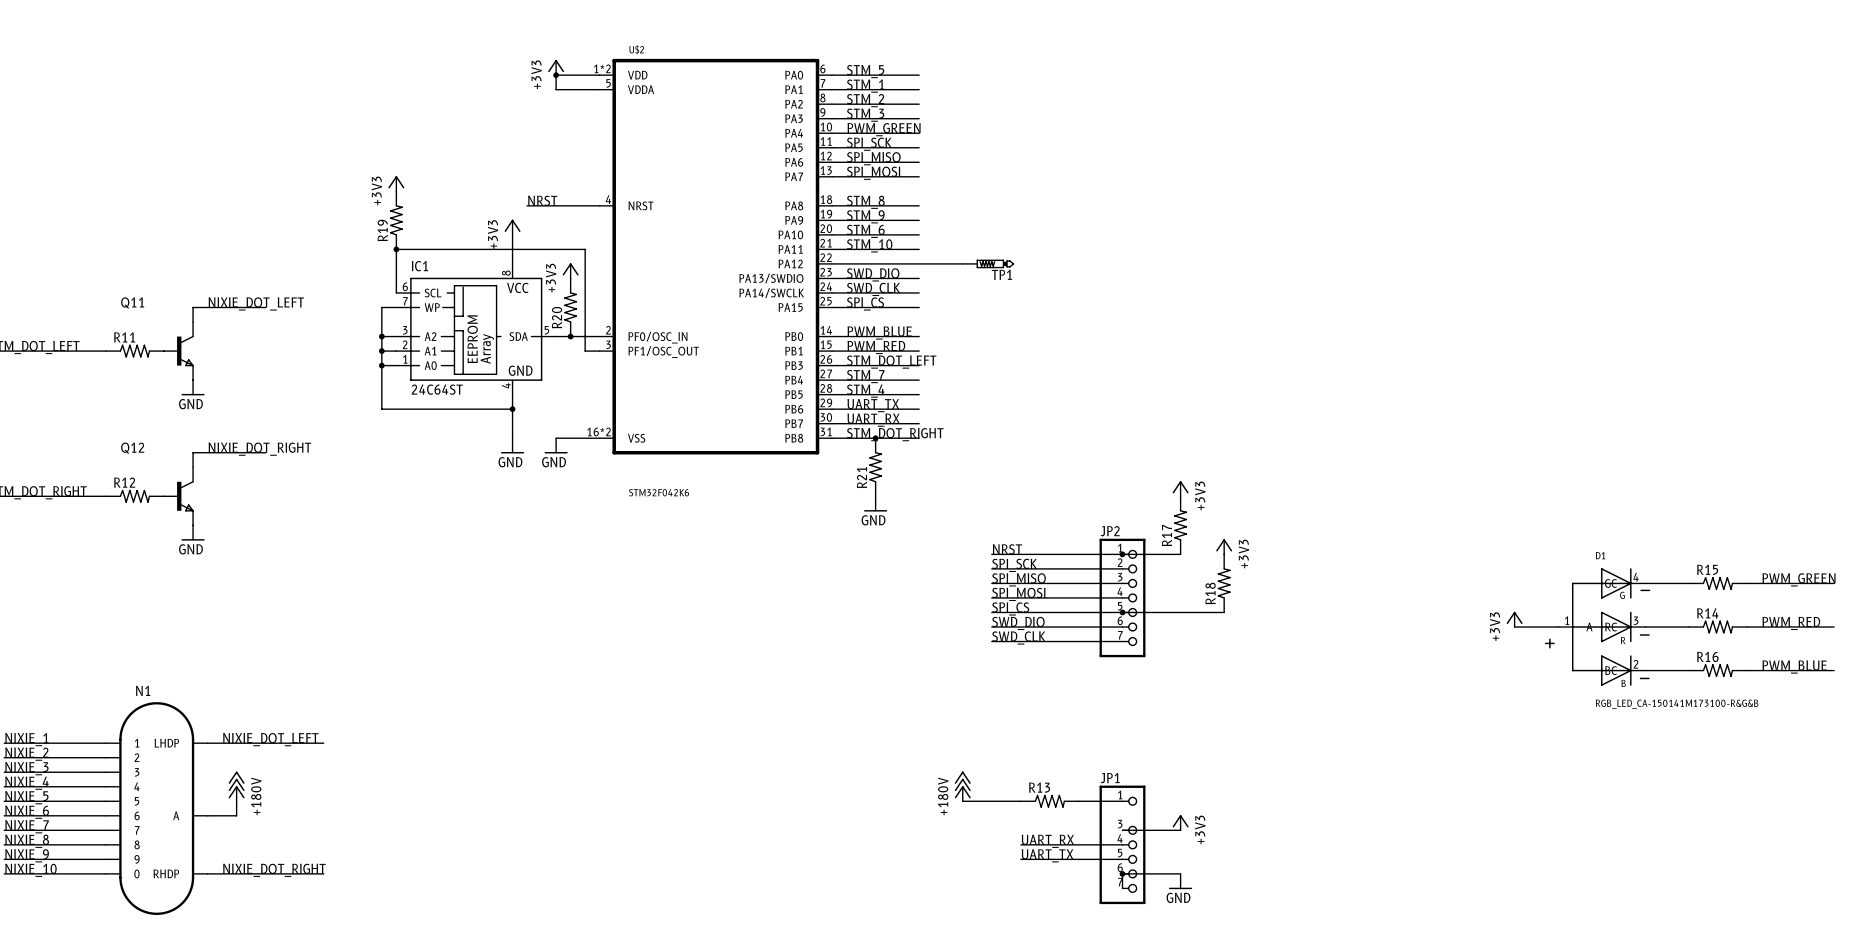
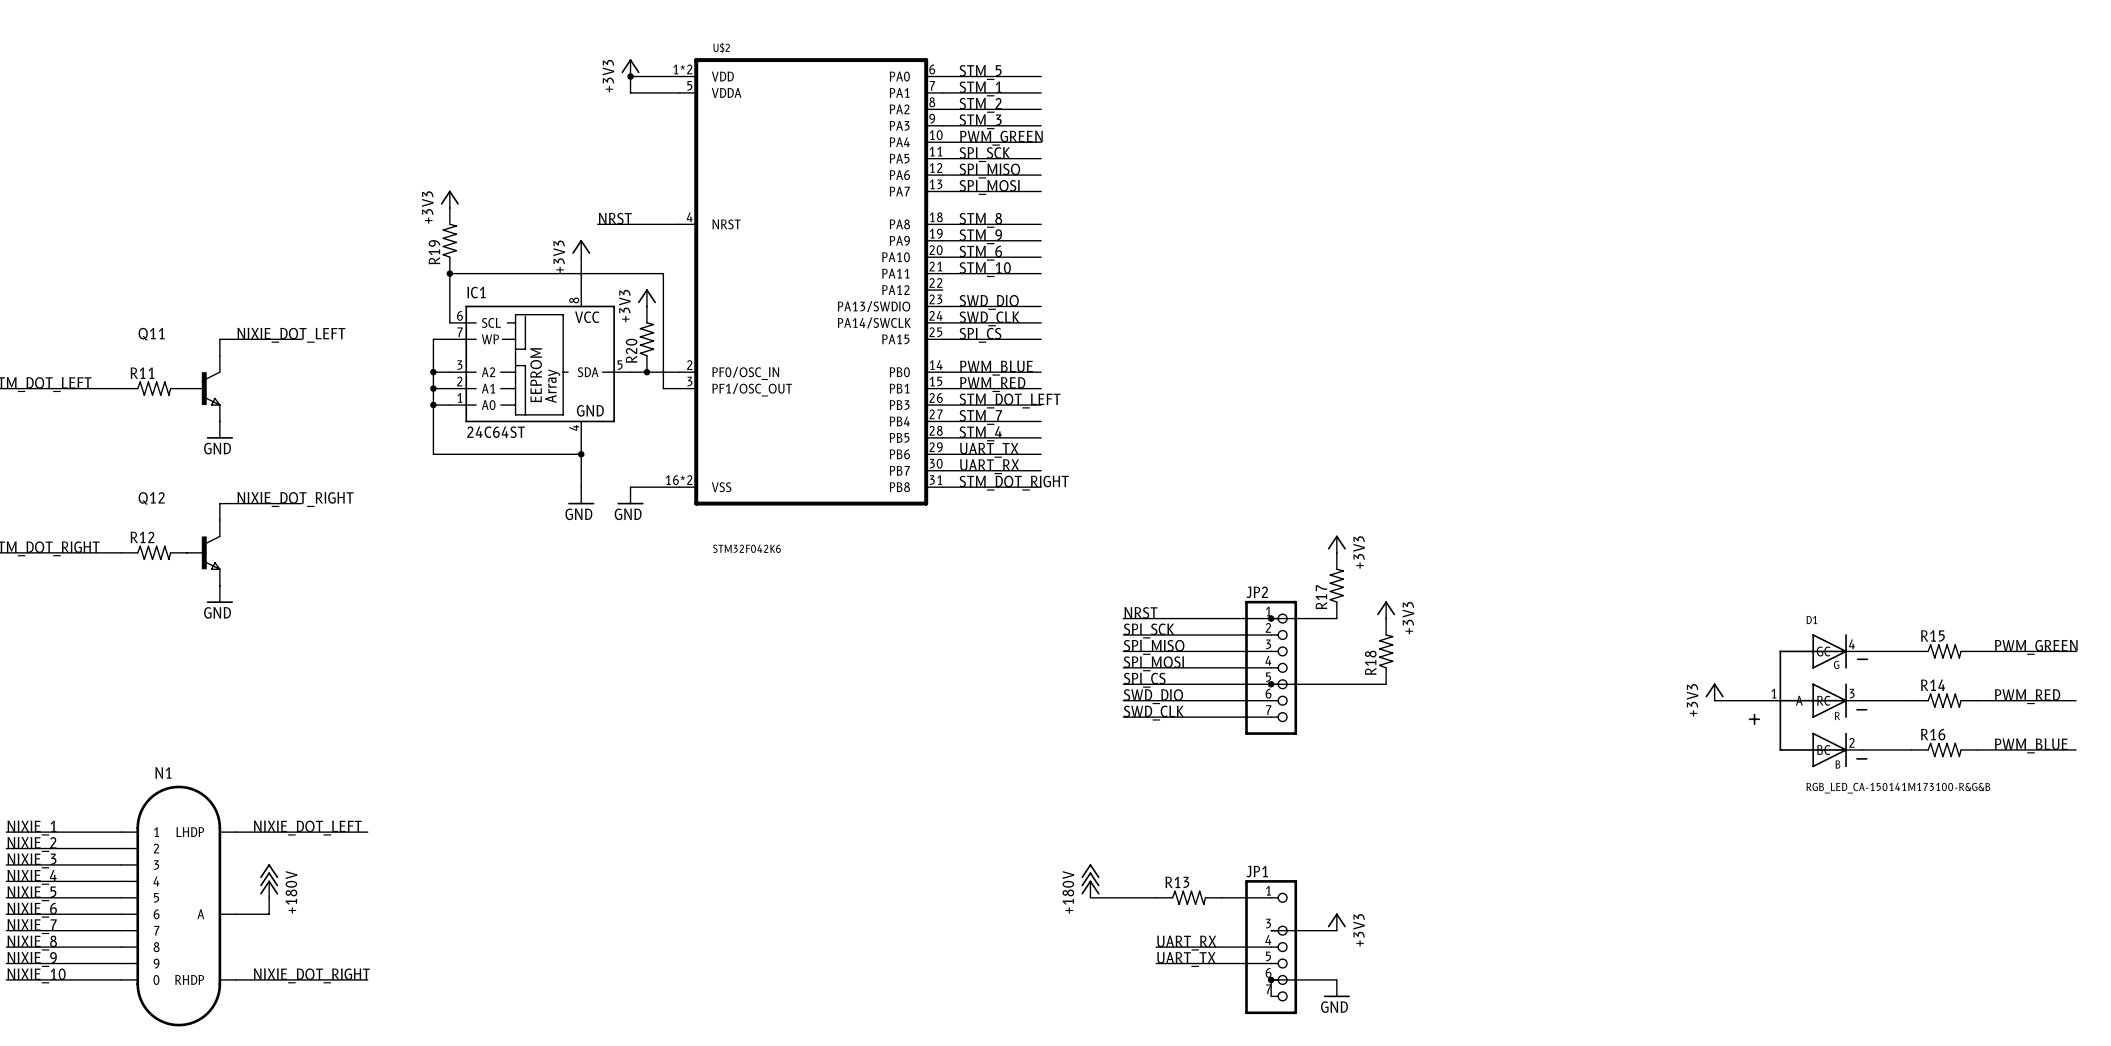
wire: (832, 263) (962, 263) -> none
TP1: (988, 263) -> none
junction: (875, 438) -> none
R21: (875, 467) -> none
power symbol: GND (875, 503) -> none

